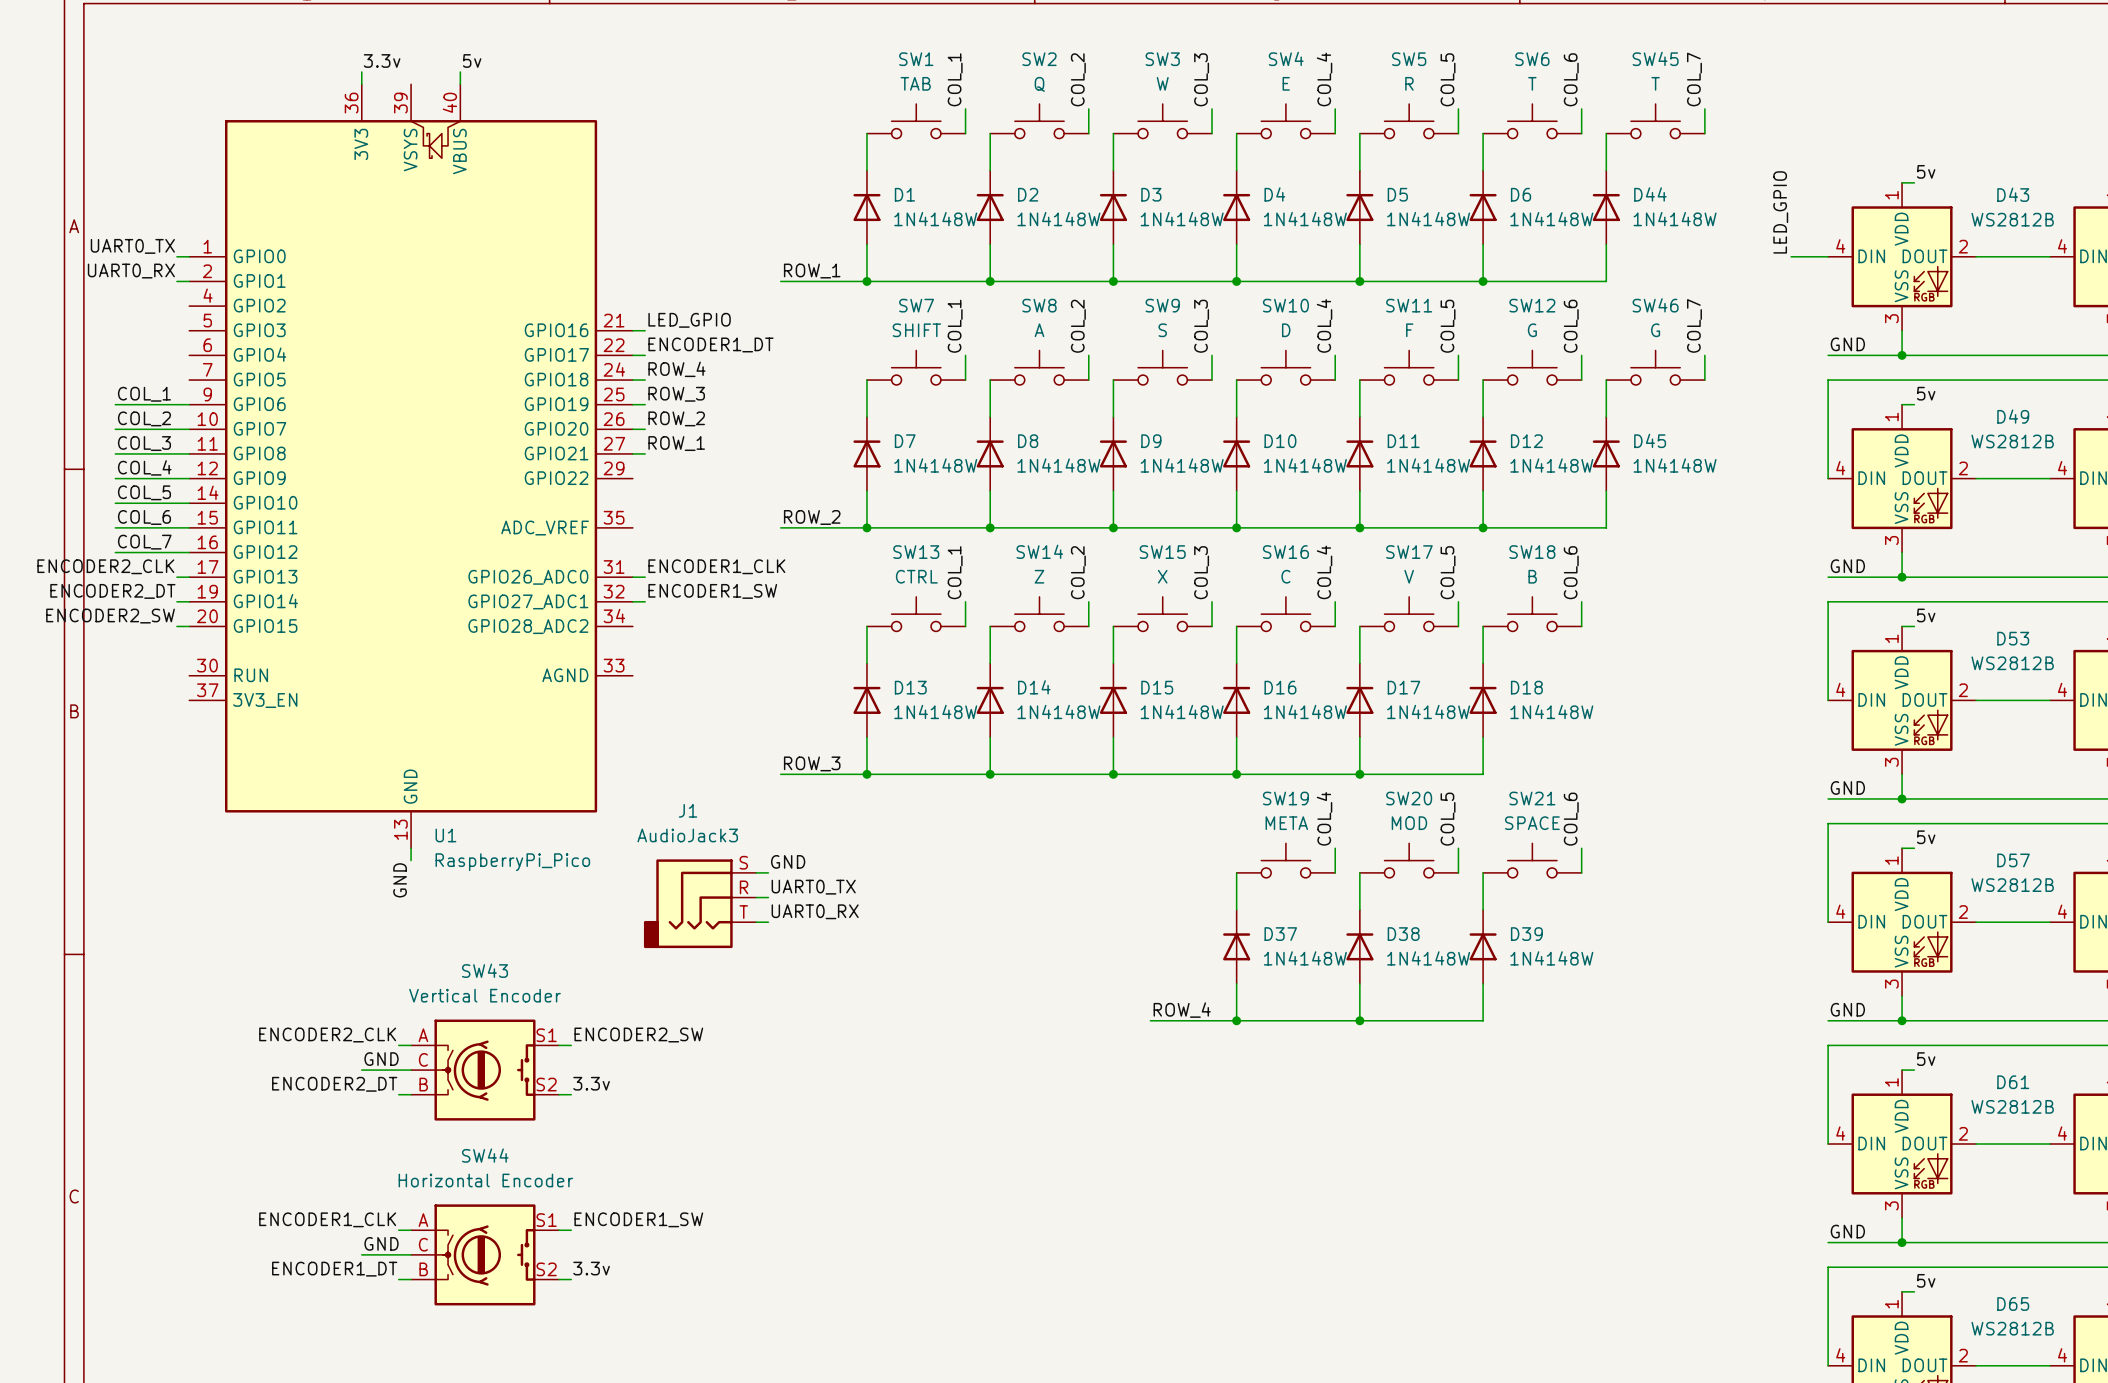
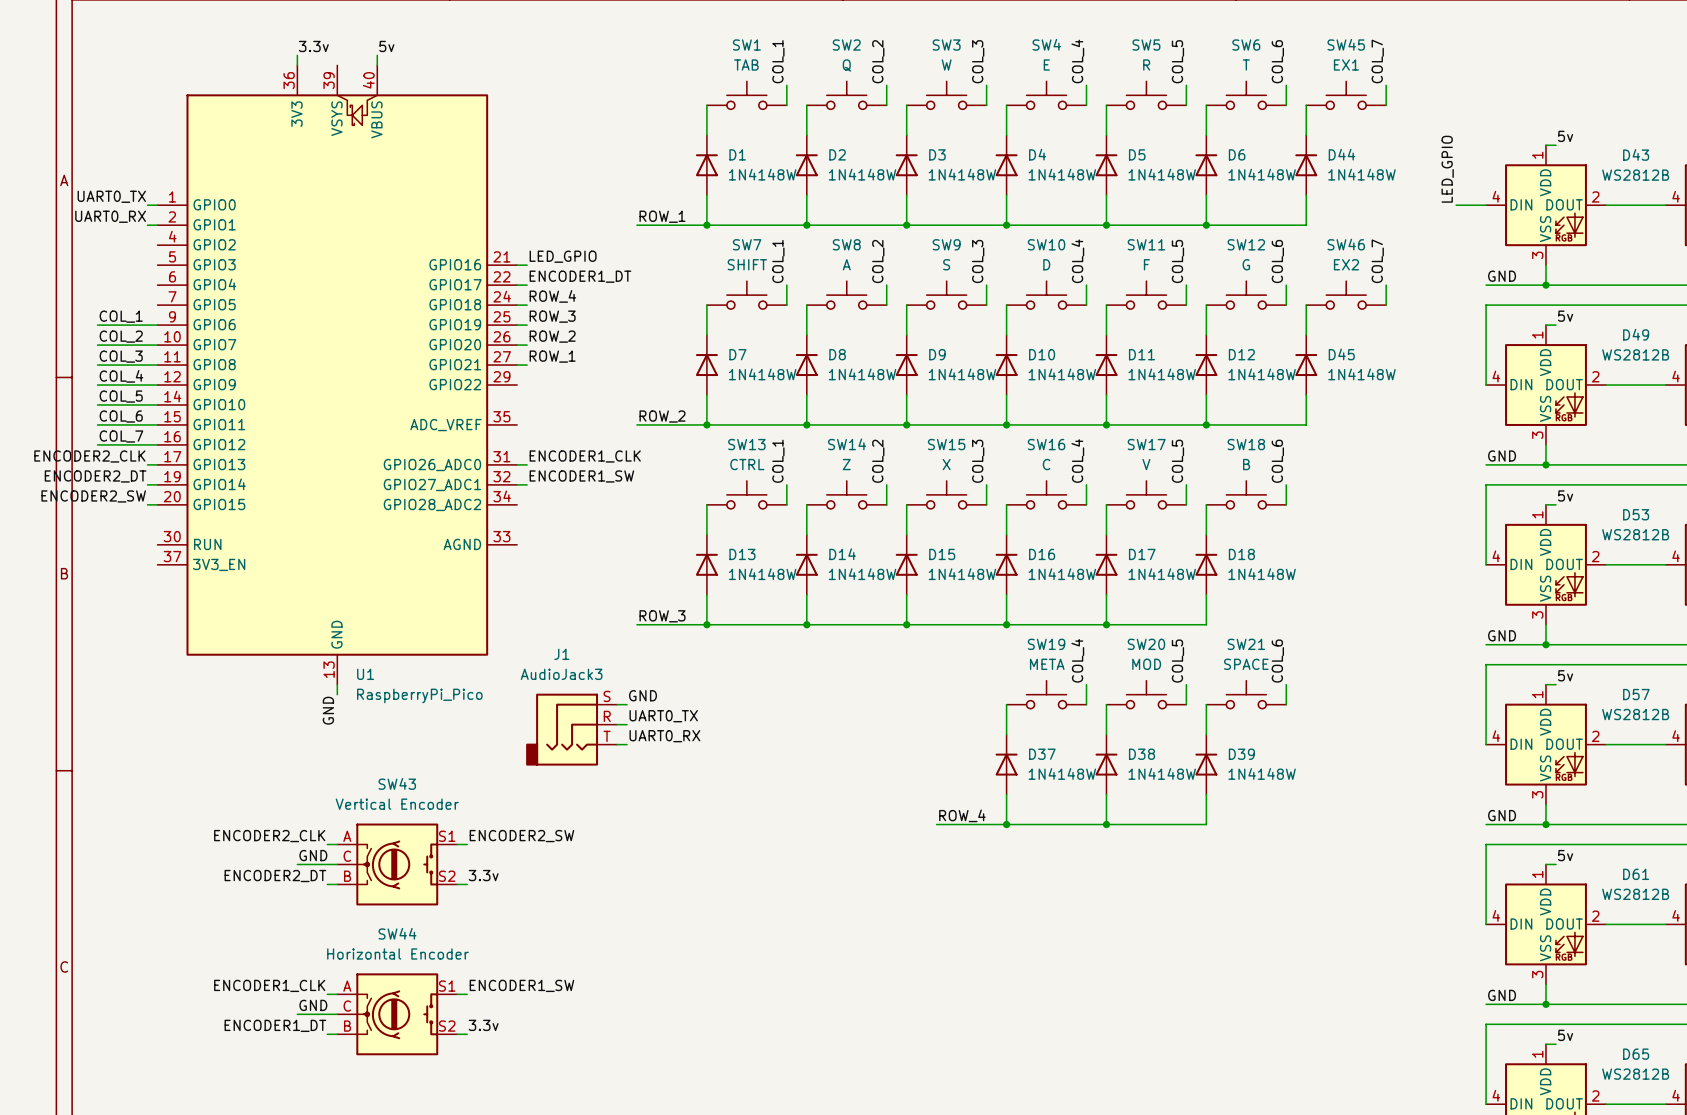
SW45 value: T (1655, 83) -> EX1 (1346, 64)
SW46 value: G (1655, 330) -> EX2 (1346, 264)

